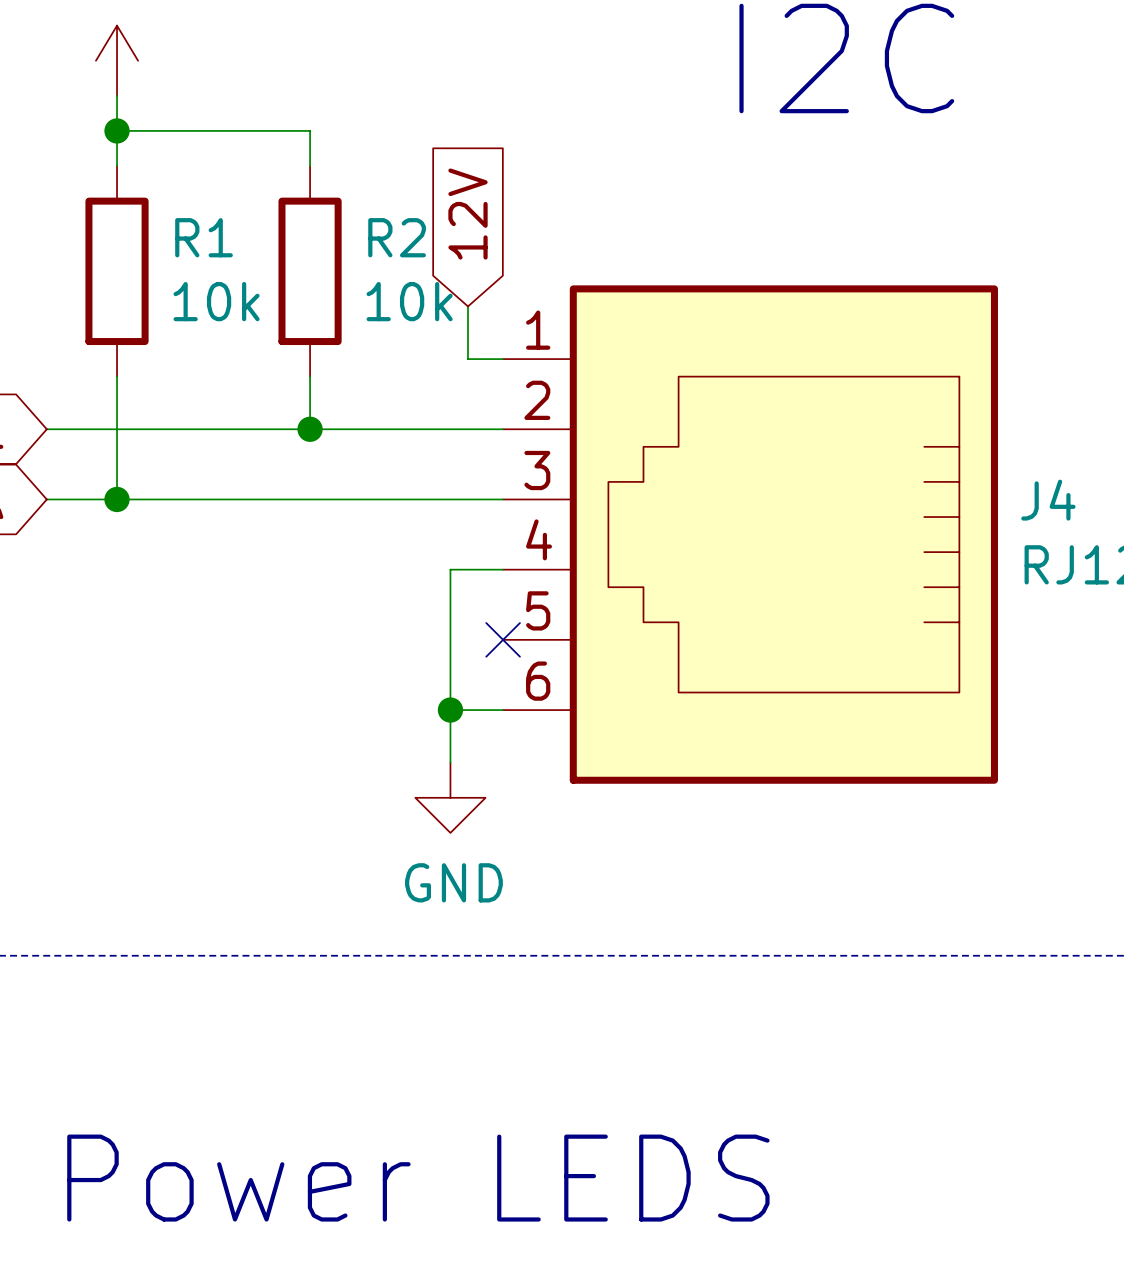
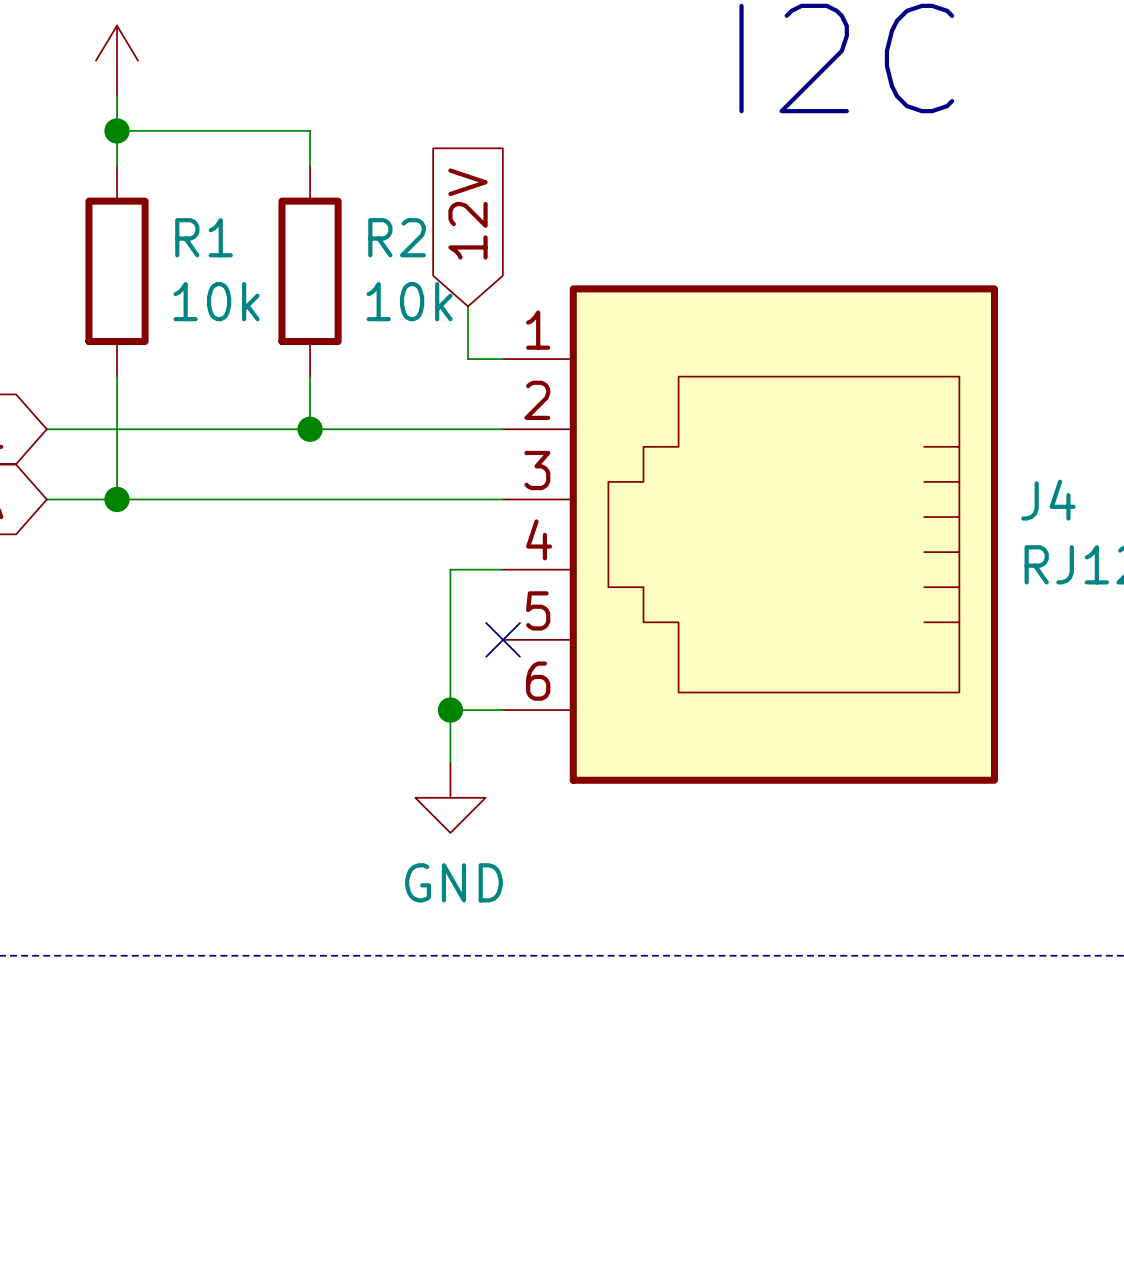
text: Power LEDS (418, 1178) -> none

